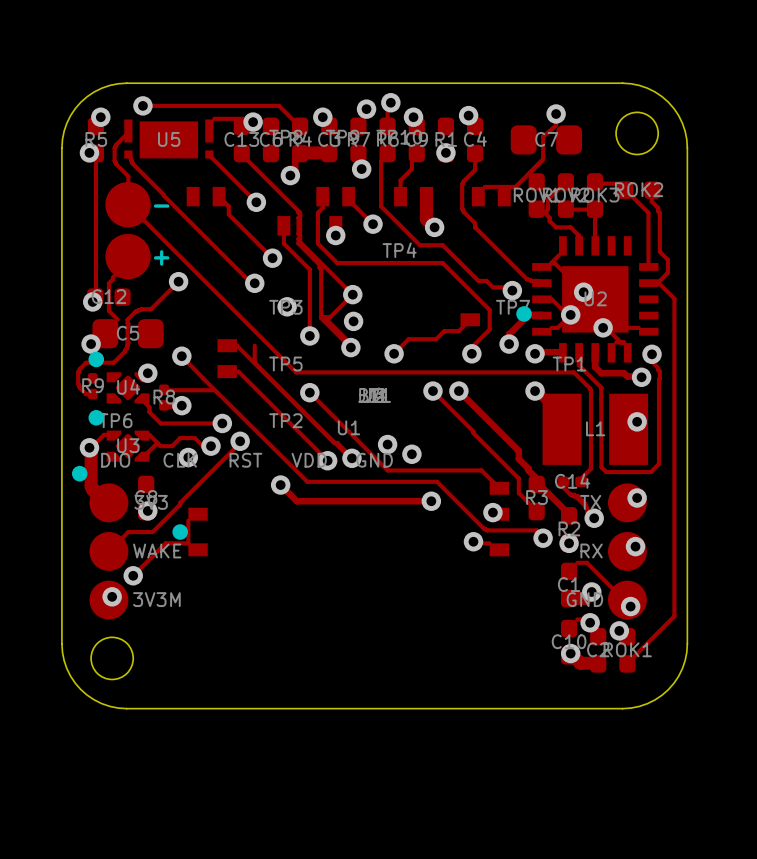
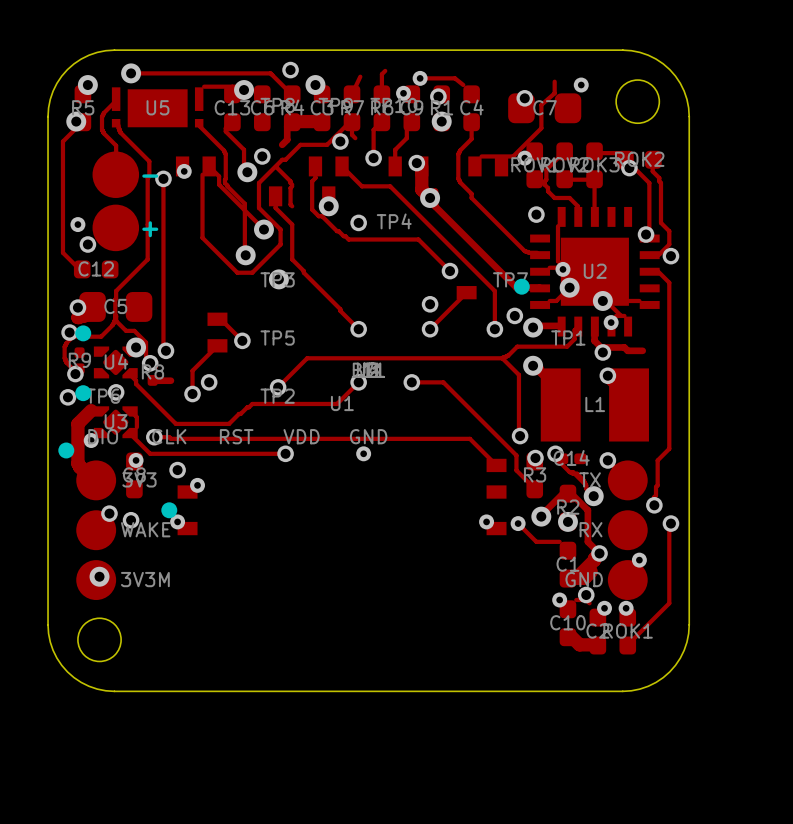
via: none -> (290, 70)
via: (390, 102) -> none
via: (366, 109) -> none
track: none -> (420, 78) (455, 78) (463, 85)
via: none -> (420, 78)
via: (556, 113) -> none
via: (468, 115) -> none
via: (413, 117) -> none
via: none -> (581, 85)
via: none -> (403, 93)
via: none -> (438, 96)
via: none -> (524, 98)
track: (95, 152) (95, 298) -> (82, 121) (62, 141) (62, 252) (79, 269) (82, 269)
track: (241, 152) (285, 198) -> (232, 121) (225, 128) (225, 131) (244, 149) (244, 173)
track: none -> (352, 121) (327, 144) (300, 144) (258, 183) (258, 207) (280, 229) (280, 244) (252, 272) (237, 272) (202, 237) (202, 174)
track: (387, 152) (381, 160) (381, 206) (420, 245) (442, 245) (478, 280) (486, 280) (492, 287) (509, 287) -> (381, 121) (373, 129) (373, 158)
track: (209, 155) (256, 202) -> (199, 124) (224, 150) (225, 153) (224, 183) (244, 203) (244, 255)
via position: (361, 169) -> (340, 141)
via: (290, 175) -> none
via: none -> (262, 156)
via: none -> (373, 158)
via: none -> (524, 158)
track: (160, 191) (251, 283) -> none
via: none -> (416, 163)
track: (348, 196) (348, 199) (373, 224) -> none
via: none -> (629, 168)
via: none -> (184, 171)
track: (128, 204) (296, 372) (519, 372) -> (502, 358) (508, 355) (517, 346)
track: none -> (163, 178) (163, 348)
via: none -> (163, 178)
track: (319, 211) (317, 212) (317, 243) (337, 263) (442, 263) -> (342, 166) (361, 186) (390, 186) (438, 234)
track: none -> (312, 181) (312, 209) (348, 239) (418, 239) (450, 271)
track: (299, 213) (300, 241) (352, 294) (330, 317) (324, 317) (351, 344) (351, 348) -> none
via: (373, 224) -> none
track: (283, 237) (283, 243) (309, 269) (309, 335) -> (275, 207) (292, 224) (292, 259) (358, 329)
track: (300, 237) (298, 243) (319, 264) (321, 269) (321, 318) (350, 347) -> none
via: none -> (536, 214)
via: none -> (358, 222)
via: none -> (77, 224)
track: (559, 254) (551, 263) (554, 263) (583, 292) -> (558, 226) (558, 261) (561, 264)
via: none -> (646, 234)
via: none -> (87, 244)
track: (115, 275) (108, 283) (108, 310) (117, 319) -> none
track: (178, 281) (151, 309) (141, 309) (135, 311) (127, 319) (128, 323) -> (149, 161) (147, 259) (116, 291) (116, 296)
via: (178, 281) -> none
track: (658, 282) (674, 298) (674, 616) (667, 622) -> (669, 526) (669, 603)
via: none -> (670, 256)
via: (512, 290) -> none
via: (583, 292) -> none
via: (352, 294) -> none
track: none -> (549, 267) (561, 267)
via: none -> (562, 269)
via: none -> (450, 271)
track: (551, 298) (564, 311) -> none
track: none -> (649, 271) (657, 271) (669, 282) (669, 448) (657, 460) (657, 485) (654, 505)
via: (92, 301) -> none
track: (489, 310) (489, 329) (471, 347) (471, 353) -> (486, 282) (494, 291) (494, 329)
track: (528, 314) (509, 334) (509, 344) -> (526, 287) (516, 287) (435, 206) (435, 191)
via: (353, 321) -> none
via: none -> (430, 304)
track: (458, 331) (444, 331) (436, 339) (408, 339) (394, 353) -> (455, 304) (430, 329)
via: none -> (77, 307)
via: (309, 335) -> none
via: none -> (514, 315)
track: none -> (116, 316) (116, 320) (126, 330) (134, 330) (146, 342) (146, 357) (152, 364)
via: (91, 344) -> none
via: (509, 344) -> none
track: (230, 345) (236, 345) (334, 442) (337, 442) (351, 458) (350, 458) (254, 362) (254, 345) -> (220, 319) (242, 340)
via position: (350, 347) -> (358, 329)
via: none -> (611, 322)
track: (578, 352) (578, 365) (601, 387) (601, 467) (606, 472) (650, 472) (659, 463) (659, 371) (652, 361) (652, 354) -> (577, 326) (574, 330) (574, 339) (567, 346)
via: (394, 353) -> none
via: (471, 353) -> none
via: (652, 354) -> none
via: none -> (430, 329)
via: none -> (494, 329)
track: (181, 356) (307, 481) (437, 481) (484, 528) (487, 530) (536, 530) (543, 537) -> none
via: (181, 356) -> none
via: none -> (69, 332)
via: none -> (242, 340)
track: (227, 371) (238, 371) (327, 460) -> (217, 345) (192, 370) (192, 394)
track: (568, 372) (573, 372) (590, 390) (590, 468) (581, 478) (581, 481) -> none
via: none -> (165, 350)
via: (641, 377) -> none
via: none -> (602, 352)
track: none -> (502, 358) (307, 358) (278, 387)
track: none -> (502, 358) (518, 374) (518, 437)
via: none -> (150, 363)
track: (168, 390) (212, 390) -> none
track: (432, 391) (473, 433) -> (411, 382) (443, 382) (469, 408)
via position: (432, 391) -> (411, 382)
track: (458, 391) (518, 451) (518, 459) (569, 515) -> none
via: (458, 391) -> none
track: (309, 392) (387, 470) (481, 470) -> (154, 437) (170, 438) (469, 438) (478, 447)
via: (309, 392) -> none
via: none -> (75, 374)
via: none -> (607, 375)
track: (147, 405) (149, 412) (160, 423) (222, 423) -> (136, 380) (136, 384) (175, 423) (229, 423) (252, 403) (337, 403) (358, 382)
via: (181, 405) -> none
via: none -> (358, 382)
via: none -> (278, 387)
via: none -> (116, 392)
via: none -> (192, 394)
via: none -> (67, 397)
via: (637, 421) -> none
via position: (222, 423) -> (209, 382)
track width: thin (104, 434) (91, 447) -> thick (91, 410) (77, 423)
track: (141, 435) (149, 434) (160, 446) (172, 446) (180, 438) (194, 438) (202, 446) (210, 446) -> (130, 411) (136, 417) (136, 427)
via: (240, 441) -> none
track: (157, 442) (141, 456) -> (285, 453) (150, 453) (130, 433)
track: (240, 442) (152, 532) (128, 532) (121, 538) -> none
via: (387, 444) -> none
via: (210, 446) -> none
via position: (89, 447) -> (91, 440)
via: (411, 454) -> none
via: (188, 457) -> none
via: (351, 458) -> none
via: none -> (520, 436)
via: none -> (154, 437)
via: (327, 460) -> none
via: none -> (363, 453)
via: none -> (555, 453)
via: none -> (535, 458)
via: none -> (136, 460)
via: none -> (607, 460)
track: (280, 485) (296, 501) (431, 501) -> none
via position: (280, 485) -> (285, 453)
via: none -> (177, 470)
via: (637, 498) -> none
via: (431, 501) -> none
via: none -> (197, 485)
via: (147, 510) -> none
via: (492, 512) -> none
track: (188, 520) (188, 543) (165, 543) (133, 575) -> none
via: none -> (654, 505)
via: none -> (109, 513)
track: none -> (538, 513) (543, 513) (562, 493) (571, 493) (587, 510) (587, 541) (599, 553) (576, 578)
via: none -> (131, 520)
via position: (473, 541) -> (486, 521)
via: none -> (177, 521)
track: (475, 543) (489, 543) -> none
track: none -> (518, 523) (536, 541) (559, 541)
via: none -> (518, 523)
via: none -> (670, 523)
via: (635, 546) -> none
track: (577, 562) (586, 562) (630, 606) -> none
via: (133, 575) -> none
via: none -> (639, 560)
via position: (591, 591) -> (599, 553)
via: (630, 606) -> none
via: none -> (586, 595)
via: none -> (559, 599)
via: (590, 622) -> none
via: none -> (604, 608)
via: none -> (626, 608)
via: (619, 630) -> none
via: (570, 653) -> none

